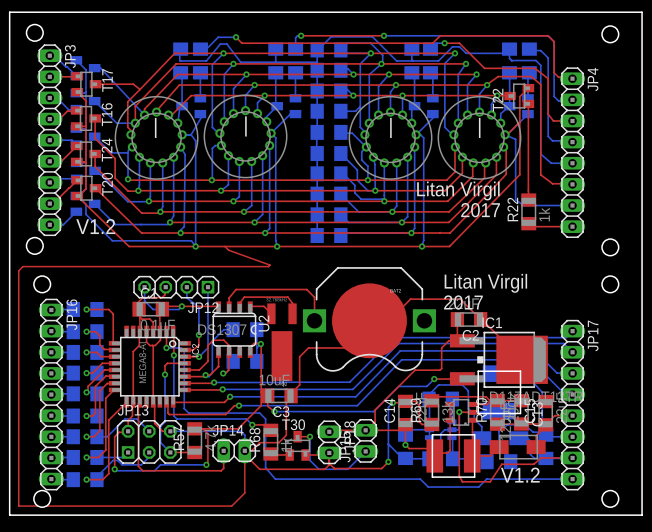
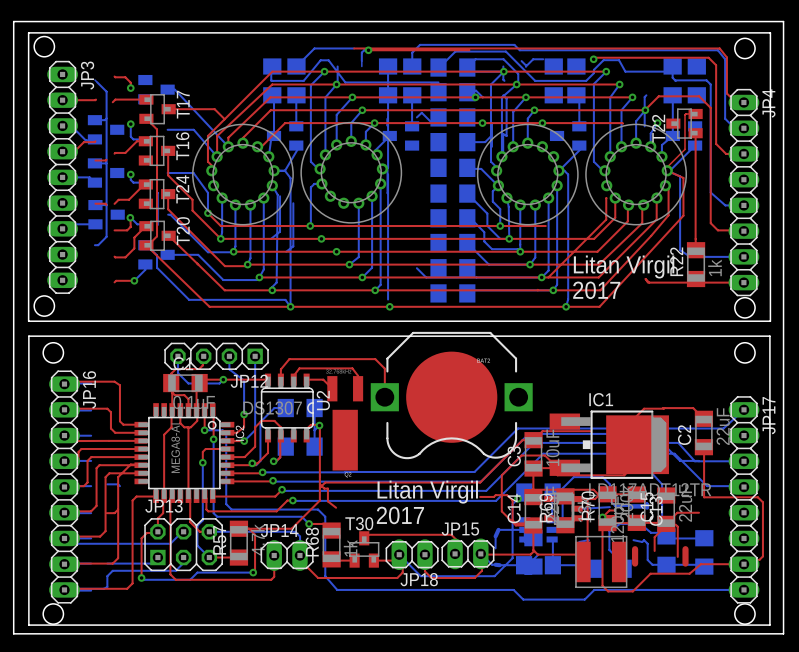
board edge: none -> (28, 32) (770, 32) (770, 321) (28, 321) (28, 32)
top track: none -> (354, 48) (719, 48) (726, 57) (726, 93) (734, 100) (745, 100) (743, 102)
bottom track: none -> (354, 48) (314, 48) (296, 66)
bottom track: (383, 35) (425, 35) -> (412, 66) (412, 52) (420, 44) (514, 44) (519, 50)
via: (383, 35) -> none
bottom track: (548, 35) (554, 41) (554, 96) (558, 100) (572, 99) -> (669, 50) (717, 50) (725, 59) (725, 118) (734, 128) (743, 128)
top track: (236, 37) (241, 43) (432, 43) (440, 35) (548, 35) (554, 41) (554, 72) (558, 77) (572, 78) -> none
bottom track: (236, 37) (218, 37) (206, 49) (200, 49) -> none
via: (236, 37) -> none
top track: (445, 41) (444, 43) (459, 43) (484, 68) (534, 68) (548, 78) (548, 114) (553, 120) (572, 120) -> none
via: (444, 43) -> none
top track: none -> (593, 59) (595, 57) (708, 57) (716, 65) (716, 143) (726, 153) (743, 153)
via: none -> (593, 59)
bottom track: (180, 49) (181, 60) (206, 60) (220, 44) (226, 44) (240, 62) (282, 62) -> (272, 66) (271, 80) (303, 80) (320, 60) (328, 60) (345, 82)
part: (329, 49) -> none
bottom track: (340, 49) (347, 43) (370, 43) (382, 55) (382, 62) (369, 74) (369, 123) -> (467, 67) (475, 59) (503, 59) (518, 73) (518, 82) (501, 97) (501, 156)
part: none -> (452, 67)
bottom track: (529, 49) (540, 50) (548, 57) (548, 136) (552, 140) (572, 142) -> none
bottom track: (317, 50) (331, 36) (372, 36) (396, 60) (438, 60) -> (438, 68) (455, 51) (505, 51) (535, 80)
top track: (222, 53) (174, 53) (140, 89) -> (272, 71) (207, 135) (207, 161) (215, 169) (211, 170)
bottom track: (223, 53) (212, 64) (212, 127) (219, 133) -> (324, 71) (310, 85) (310, 161) (320, 168)
via: (223, 53) -> none
via: none -> (324, 71)
bottom track: (343, 53) (370, 53) (360, 63) (360, 127) (366, 133) (364, 134) -> (470, 71) (503, 71) (490, 84) (490, 161) (498, 169) (496, 170)
via: (370, 53) -> none
via: none -> (503, 71)
bottom track: (454, 53) (444, 63) (444, 127) (453, 134) -> (606, 71) (593, 83) (593, 161) (604, 170)
via: (454, 53) -> none
top track: none -> (556, 71) (606, 71)
via: none -> (606, 71)
bottom track: (49, 55) (54, 55) (76, 76) -> none
top track: none -> (114, 76) (125, 77) (130, 82) (130, 88)
part: (180, 60) -> none
part: (200, 60) -> none
part: none -> (272, 80)
part: none -> (296, 80)
part: (275, 60) -> none
part: (295, 60) -> none
part: none -> (388, 80)
part: none -> (412, 80)
part: (411, 60) -> none
part: (430, 60) -> none
bottom track: (438, 60) (452, 46) (459, 46) (466, 53) (508, 53) (509, 49) (509, 58) (512, 60) -> (535, 80) (586, 80) (603, 60) (619, 60) (625, 71) (671, 71) (672, 66) (672, 77) (675, 80)
part: none -> (553, 80)
part: none -> (576, 80)
part: (509, 60) -> none
bottom track: (511, 60) (535, 60) (540, 65) (540, 154) (551, 163) (572, 163) -> none
part: (529, 60) -> none
part: none -> (672, 80)
bottom track: none -> (675, 80) (706, 80) (710, 84) (710, 192) (725, 205) (743, 205)
part: none -> (696, 80)
bottom track: none -> (388, 82) (438, 82)
top track: (222, 63) (176, 63) (135, 106) (135, 123) -> (272, 84) (217, 136) (217, 156)
bottom track: (233, 63) (224, 74) (224, 121) -> (336, 84) (325, 97) (325, 154)
via: (233, 63) -> none
via: none -> (336, 84)
via: (381, 63) -> none
via: none -> (516, 84)
top track: none -> (569, 84) (619, 84)
bottom track: (465, 63) (458, 74) (458, 123) -> (619, 84) (610, 97) (610, 156)
via: (465, 63) -> none
via: none -> (619, 84)
via: none -> (130, 88)
part: (85, 68) -> none
bottom track: (94, 68) (100, 68) (144, 115) -> (167, 89) (174, 89) (228, 146)
part: none -> (156, 89)
part: (329, 70) -> none
bottom track: (340, 70) (348, 68) (353, 74) -> (467, 92) (476, 90) (482, 97)
part: none -> (452, 92)
bottom track: (180, 72) (180, 107) -> (272, 95) (274, 97) (274, 135) (272, 137)
bottom track: (200, 72) (200, 98) -> (296, 95) (296, 126)
bottom track: (275, 72) (276, 106) -> none
bottom track: (295, 72) (295, 98) -> (412, 95) (412, 126)
bottom track: (430, 72) (432, 75) (432, 98) -> (576, 95) (579, 98) (579, 126)
bottom track: (509, 72) (509, 106) (500, 113) (500, 123) -> (672, 95) (672, 135) (661, 145) (661, 156)
top track: (220, 74) (177, 74) (144, 109) (144, 115) -> (270, 97) (228, 137) (228, 146)
bottom track: (246, 74) (233, 88) (233, 113) -> (352, 97) (336, 114) (336, 144)
via: (246, 74) -> none
via: none -> (352, 97)
via: (353, 74) -> none
bottom track: (389, 74) (378, 86) (378, 115) -> (525, 97) (513, 111) (513, 146)
via: none -> (525, 97)
top track: none -> (582, 97) (632, 97)
bottom track: (476, 74) (467, 84) (467, 115) -> (632, 97) (621, 110) (621, 146)
via: (476, 74) -> none
via: none -> (632, 97)
top track: none -> (146, 99) (115, 99) (112, 102)
T17 position: (86, 84) -> (157, 109)
top track: (95, 84) (133, 84) (140, 89) -> none
top track: none -> (168, 109) (214, 109) (224, 119)
top track: (220, 85) (179, 85) (156, 112) -> (270, 110) (243, 137) (242, 143)
bottom track: (254, 85) (245, 95) (245, 110) -> (362, 110) (351, 123) (351, 141)
via: (254, 85) -> none
via: none -> (362, 110)
bottom track: (395, 85) (390, 91) (390, 112) -> (534, 110) (527, 118) (527, 143)
via: (395, 85) -> none
via: none -> (534, 110)
top track: (487, 85) (498, 76) (531, 76) (540, 84) (540, 174) (552, 183) (580, 183) -> (594, 110) (645, 110) (658, 96) (699, 96) (710, 107) (710, 223) (717, 230) (743, 231)
bottom track: (487, 85) (479, 94) (479, 112) -> (645, 110) (636, 121) (636, 143)
via: (487, 85) -> none
via: none -> (645, 110)
top track: (528, 88) (519, 96) (519, 174) (449, 246) -> (695, 113) (684, 114) (684, 149) (665, 169) (683, 177) (683, 215) (599, 306) (549, 306)
top track: (140, 89) (127, 101) (127, 127) (133, 133) (130, 134) -> none
part: (329, 90) -> none
part: none -> (452, 117)
top track: (77, 92) (85, 100) (85, 188) (77, 196) (129, 246) (170, 246) -> (146, 118) (157, 129) (157, 236) (146, 245) (209, 306)
top track: (232, 95) (191, 95) (171, 115) (168, 115) -> (285, 123) (261, 146) (257, 146)
bottom track: (264, 95) (257, 102) (257, 113) -> (374, 123) (365, 131) (365, 144)
via: (264, 95) -> none
via: none -> (374, 123)
via: (353, 95) -> none
via: none -> (482, 123)
via: (402, 95) -> none
via: none -> (542, 123)
bottom track: (497, 95) (491, 104) (491, 115) -> (657, 123) (650, 133) (650, 146)
via: (497, 95) -> none
via: none -> (657, 123)
bottom track: none -> (130, 124) (130, 136) (133, 139) (145, 139)
via: none -> (130, 124)
T22 position: (519, 96) -> (684, 123)
bottom track: (94, 101) (116, 123) (135, 123) -> none
bottom track: none -> (167, 129) (193, 129) (217, 156)
part footprint: [310, 103, 348, 119] -> [382, 121, 420, 151]
top track: (528, 103) (528, 200) -> (695, 133) (696, 250)
part: (191, 106) -> none
part: none -> (285, 135)
bottom track: (277, 106) (265, 118) (266, 121) -> (389, 135) (375, 150) (377, 154)
part: (286, 106) -> none
bottom track: (360, 106) (355, 111) (340, 111) -> (490, 136) (485, 142) (467, 142)
part: (423, 106) -> none
part: none -> (568, 135)
part: (518, 106) -> none
part: none -> (683, 135)
bottom track: (180, 107) (177, 123) -> (272, 137) (268, 156)
top track: none -> (145, 141) (137, 141) (125, 152) (114, 153)
part: none -> (452, 142)
bottom track: (200, 114) (201, 116) (191, 134) (182, 134) (191, 134) (195, 140) (195, 246) (191, 240) -> (298, 148) (284, 170) (274, 170) (284, 170) (290, 178) (290, 306) (285, 299) (234, 299)
bottom track: (295, 114) (290, 114) (271, 133) (275, 137) (277, 246) -> none
bottom track: (432, 114) (434, 116) (416, 134) (420, 134) (423, 137) (423, 240) (422, 246) -> (579, 145) (581, 148) (558, 170) (564, 170) (568, 174) (568, 299) (566, 306)
bottom track: (527, 114) (505, 134) (515, 139) (515, 200) (524, 205) (565, 205) -> (695, 145) (669, 170) (667, 170) (680, 176) (680, 250) (690, 256)
T16 position: (85, 118) -> (157, 150)
top track: (95, 118) (95, 138) (115, 158) (115, 178) (128, 191) (139, 190) -> none
top track: (519, 121) (505, 134) -> none
text: | (245, 126) -> none
text: | (155, 127) -> none
text: | (390, 127) -> none
text: | (479, 127) -> none
part: (329, 132) -> none
bottom track: (340, 132) (352, 133) (366, 147) (361, 151) (361, 160) (367, 166) (367, 180) -> (467, 167) (481, 168) (498, 185) (492, 191) (492, 201) (500, 209) (500, 226)
part: none -> (452, 167)
bottom track: (94, 136) (110, 152) (127, 152) (129, 147) (132, 147) -> none
bottom track: none -> (167, 173) (193, 173) (207, 192) (207, 213)
part: (245, 136) -> none
part: none -> (351, 172)
bottom track: none -> (130, 174) (130, 179) (133, 182) (145, 182)
via: none -> (130, 174)
part: (156, 137) -> none
part: none -> (242, 174)
part: (390, 137) -> none
part: none -> (527, 174)
part: (479, 137) -> none
part: none -> (636, 174)
bottom track: (221, 145) (215, 145) (212, 148) (211, 180) -> (321, 183) (314, 183) (310, 187) (310, 226)
bottom track: (269, 145) (269, 228) (265, 232) -> (380, 183) (380, 284) (375, 290)
top track: (76, 146) (61, 161) (49, 161) -> none
top track: none -> (145, 184) (128, 199) (118, 199) (114, 203)
bottom track: (180, 147) (185, 154) (184, 226) (180, 232) -> (272, 185) (277, 194) (276, 282) (272, 286) (272, 290)
bottom track: (414, 147) (414, 228) (411, 232) -> (557, 185) (557, 284) (553, 290) (502, 290)
top track: (455, 147) (454, 171) (446, 180) -> none
top track: (503, 147) (506, 149) (506, 174) (450, 232) -> (665, 185) (668, 188) (668, 215) (600, 290) (549, 290)
JP4 position: (572, 152) -> (743, 192)
T24 position: (85, 153) -> (157, 194)
top track: (95, 153) (95, 166) (141, 213) (200, 211) -> (168, 194) (168, 209) (224, 266) (246, 264)
part: (329, 153) -> none
bottom track: (340, 153) (357, 170) (357, 180) (367, 190) (375, 190) (373, 157) -> (467, 193) (487, 213) (487, 226) (500, 238) (509, 238) (506, 198)
part: none -> (452, 193)
bottom track: (262, 155) (262, 214) (254, 222) -> (372, 196) (372, 267) (362, 277)
bottom track: (139, 157) (138, 190) -> (222, 198) (220, 238)
bottom track: (173, 157) (173, 215) (167, 224) (115, 224) (94, 203) -> none
bottom track: none -> (263, 198) (263, 269) (256, 280) (223, 280) (198, 254) (167, 254)
bottom track: (407, 157) (407, 216) (401, 222) -> (548, 198) (548, 270) (541, 277) (491, 277)
top track: (462, 157) (462, 173) (445, 190) -> (615, 198) (615, 217) (594, 238) (543, 238)
top track: none -> (656, 198) (656, 219) (598, 277) (548, 277)
bottom track: (251, 161) (251, 205) (244, 211) -> (358, 203) (358, 257) (349, 264)
bottom track: (150, 162) (150, 196) (148, 201) (127, 201) (95, 170) -> (235, 205) (235, 246) (233, 252) (207, 252) (170, 214) (168, 214)
bottom track: (162, 162) (162, 206) (160, 211) -> (250, 205) (250, 258) (247, 264)
bottom track: (384, 162) (384, 201) (382, 199) (361, 199) (354, 192) (354, 185) (343, 173) (340, 173) -> (520, 205) (520, 251) (517, 249) (492, 249) (484, 241) (484, 232) (470, 218) (467, 218)
bottom track: (396, 162) (396, 206) (392, 211) (358, 211) (340, 194) -> (535, 205) (535, 257) (530, 264) (488, 264) (467, 242)
top track: (473, 162) (472, 176) (447, 201) -> (628, 205) (627, 221) (597, 251) (547, 251)
top track: (485, 162) (484, 177) (449, 211) -> (643, 205) (642, 223) (599, 264) (548, 264)
via: none -> (207, 213)
top track: none -> (130, 217) (130, 226) (127, 230) (114, 230)
bottom track: none -> (130, 217) (137, 224) (145, 224)
via: none -> (130, 217)
part: (329, 173) -> none
part: none -> (452, 218)
top track: (128, 179) (179, 180) -> (207, 213) (220, 226)
via: (128, 179) -> none
top track: (77, 180) (53, 203) (49, 203) -> none
top track: none -> (145, 226) (134, 237) (134, 248) (125, 257) (114, 256)
via: (211, 180) -> none
via: none -> (310, 226)
via: (367, 180) -> none
via: none -> (500, 226)
T20 position: (86, 188) -> (157, 235)
top track: (95, 188) (141, 232) (183, 232) -> (168, 235) (224, 290)
top track: (138, 190) (179, 190) -> (168, 150) (168, 175) (192, 199) (192, 210) (220, 238)
via: (138, 190) -> none
via: none -> (220, 238)
via: (221, 190) -> none
via: none -> (321, 238)
via: (375, 190) -> none
via: none -> (509, 238)
text position: Litan Virgil (458, 190) -> Litan Virgil (624, 266)
part: (329, 194) -> none
part: none -> (452, 242)
bottom track: (77, 195) (85, 204) (85, 214) (112, 240) (153, 240) -> (146, 245) (157, 255) (157, 267) (189, 299)
top track: (148, 201) (190, 201) -> none
via: (148, 201) -> none
via: none -> (233, 251)
via: (233, 201) -> none
via: none -> (336, 251)
via: (384, 201) -> none
via: none -> (520, 251)
part position: (85, 203) -> (156, 254)
bottom track: none -> (698, 256) (743, 256)
text position: 2017 (480, 210) -> 2017 (596, 290)
bottom track: (76, 211) (63, 224) (49, 224) -> none
bottom track: none -> (145, 264) (145, 269) (134, 280)
via: (160, 211) -> none
via: none -> (247, 264)
via: (244, 211) -> none
via: none -> (349, 264)
via: (392, 211) -> none
via: none -> (530, 264)
R22 position: (528, 211) -> (696, 264)
part: (329, 214) -> none
part: none -> (452, 268)
top track: (170, 222) (211, 222) -> none
via: (170, 222) -> none
via: none -> (259, 277)
via: (254, 222) -> none
via: none -> (362, 277)
via: (401, 222) -> none
via: none -> (541, 277)
top track: none -> (134, 280) (114, 282)
via: none -> (134, 280)
text: V1.2 (95, 226) -> none
top track: none -> (698, 282) (743, 282)
via: (180, 232) -> none
via: none -> (272, 290)
via: (265, 232) -> none
via: none -> (375, 290)
via: (411, 232) -> none
via: none -> (553, 290)
part: (329, 235) -> none
part: none -> (452, 293)
via: (195, 246) -> none
top track: (224, 246) (228, 250) (270, 265) (22, 266) (18, 270) (18, 506) (231, 506) (244, 493) (244, 450) (251, 450) (259, 442) (278, 442) (286, 435) (286, 402) (299, 384) (299, 356) (308, 347) (345, 347) (372, 320) -> none
via: none -> (290, 306)
via: (277, 246) -> none
via: none -> (389, 306)
via: (422, 246) -> none
via: none -> (566, 306)
board edge: none -> (28, 336) (769, 336) (769, 625) (28, 625) (28, 336)
text: Litan Virgil (485, 283) -> none
text: 2017 (463, 302) -> none
part: (85, 309) -> none
top track: (86, 309) (108, 309) (113, 313) (114, 343) -> (53, 384) (56, 381) (114, 381) (119, 385) (119, 421) (123, 424) (140, 424)
via: (86, 309) -> none
top track: (457, 319) (457, 335) (462, 340) (448, 340) (441, 347) (441, 368) (415, 370) (375, 410) (375, 421) (366, 430) -> none
C2 rotation: 0° (469, 319) -> 90° clockwise (703, 432)
C2 position: (469, 319) -> (703, 432)
top track: (388, 320) (410, 299) (460, 299) (522, 359) -> none
top track: none -> (662, 408) (693, 408) (703, 418)
top track: none -> (664, 408) (644, 408) (635, 417) (635, 464) (624, 475) (557, 475) (550, 468) (550, 460) (545, 455) (521, 455) (501, 475) (501, 511) (515, 525) (533, 525) (533, 550) (537, 554) (575, 554) (583, 561) (587, 557) (587, 500)
part: (85, 331) -> none
top track: (86, 331) (95, 331) (99, 336) (99, 345) (104, 349) (114, 350) -> (53, 409) (107, 408) (110, 412) (110, 428) (115, 432) (140, 432)
via: (86, 331) -> none
bottom track: (572, 331) (566, 337) (394, 337) (349, 382) -> (744, 409) (723, 428) (518, 428) (474, 471) (427, 471)
top track: none -> (590, 431) (542, 431) (533, 440) (522, 440) (480, 482) (325, 482) (319, 487)
bottom track: (432, 350) (400, 350) (355, 396) (230, 396) -> (528, 433) (481, 481) (273, 481)
part: (85, 352) -> none
top track: (86, 352) (96, 352) (101, 356) -> (53, 435) (58, 441) (125, 440)
via: (86, 352) -> none
bottom track: (572, 352) (563, 343) (398, 343) (352, 389) (222, 389) -> none
top track: none -> (704, 447) (704, 497) (757, 497) (762, 502) (762, 556) (759, 559) (746, 559) (744, 564) (700, 564) (689, 573) (650, 573) (632, 591) (608, 591) (602, 585) (602, 517) (609, 510) (614, 510)
top track: (102, 363) (92, 373) (86, 373) -> (126, 449) (81, 449) (78, 451) (76, 460) (53, 461)
top track: (104, 369) (88, 386) (86, 392) -> (129, 457) (91, 457) (87, 460) (87, 482) (83, 486) (53, 487)
part: (85, 373) -> none
via: (86, 373) -> none
bottom track: none -> (744, 461) (694, 461) (678, 442) (534, 442) (486, 490) (284, 490)
top track: none -> (140, 465) (99, 465) (96, 468) (96, 505) (91, 511) (53, 512)
bottom track: (434, 379) (426, 386) (398, 386) (373, 411) (274, 411) -> none
via: (434, 379) -> none
top track: none -> (533, 468) (533, 497)
top track: (114, 383) (107, 383) (99, 390) (99, 430) (93, 436) (86, 436) -> (140, 473) (109, 473) (105, 477) (105, 531) (100, 536) (59, 536) (53, 538)
top track: (114, 389) (105, 398) (105, 450) (98, 457) (91, 457) -> (118, 509) (118, 558) (112, 563)
via: (86, 392) -> none
part: (499, 392) -> none
part: (85, 393) -> none
bottom track: (572, 394) (565, 394) (530, 359) (401, 359) (357, 405) (238, 405) -> none
bottom track: none -> (744, 487) (707, 486) (674, 453) (543, 453) (496, 500) (295, 500)
C3 rotation: 0° (279, 395) -> 90° clockwise (533, 454)
C3 position: (279, 395) -> (533, 454)
text: none -> Litan Virgil (427, 492)
top track: (126, 402) (108, 420) (108, 473) (102, 479) (86, 479) -> (156, 496) (136, 496) (132, 500) (132, 583) (127, 588) (53, 589)
bottom track: (392, 402) (388, 407) (388, 461) -> none
via: (392, 402) -> none
bottom track: none -> (518, 498) (512, 504) (512, 558) (494, 576) (420, 576) (399, 554)
via: none -> (518, 498)
top track: (450, 404) (450, 450) (439, 455) (434, 455) -> none
JP17 position: (572, 405) -> (744, 499)
bottom track: none -> (646, 504) (645, 505) (615, 505) (609, 500) (609, 484) (602, 477) (573, 477) (562, 488) (562, 522)
bottom track: none -> (646, 504) (645, 506) (632, 506) (630, 508) (647, 507) (646, 504)
via: (274, 411) -> none
R69 position: (431, 412) -> (565, 510)
bottom track: (459, 412) (459, 428) (444, 429) (440, 433) (440, 450) -> none
via: (459, 412) -> none
top track: (472, 412) (459, 412) (459, 475) (462, 481) (490, 481) (501, 464) (533, 464) (541, 457) (572, 457) -> none
C14 position: (405, 413) -> (533, 511)
part: (85, 416) -> none
via: (86, 416) -> none
text: none -> 2017 (400, 515)
via: none -> (602, 517)
top track: (472, 420) (472, 453) -> none
bottom track: (429, 421) (429, 394) (438, 384) (462, 384) (468, 390) (468, 408) (474, 412) (474, 419) (481, 426) (481, 438) -> none
top track: (405, 424) (405, 444) (409, 448) (440, 448) (434, 455) -> none
top track: none -> (675, 524) (677, 526) (677, 556)
top track: (405, 427) (402, 430) (329, 431) -> none
bottom track: (149, 431) (136, 418) (125, 418) (107, 436) (86, 436) -> (183, 531) (170, 543) (58, 543) (53, 538)
part: (85, 436) -> none
via: (86, 436) -> none
top track: (298, 436) (309, 436) -> (364, 538) (368, 534) (451, 534) (456, 540) (455, 553)
bottom track: (309, 436) (309, 460) (318, 469) (347, 469) (365, 451) -> none
via: (309, 436) -> none
part: (500, 438) -> none
JP15 rotation: 0° (365, 440) -> 90° clockwise (467, 553)
JP18 rotation: 0° (329, 442) -> 90° clockwise (412, 554)
via: (405, 444) -> none
top track: none -> (635, 549) (635, 563)
top track: none -> (685, 549) (685, 563)
part position: (405, 446) -> (533, 552)
top track: none -> (534, 550) (530, 554) (481, 555)
top track: (499, 447) (490, 455) (472, 455) -> none
part: (517, 447) -> none
part: none -> (704, 552)
top track: none -> (424, 554) (424, 571) (431, 577) (474, 577) (481, 570) (481, 555)
top track: (329, 452) (329, 463) (335, 469) -> none
part: (453, 455) -> none
part: none -> (601, 561)
part: (85, 457) -> none
top track: none -> (107, 563) (53, 564)
via: (86, 457) -> none
top track: (388, 461) (381, 468) (334, 468) -> none
via: (388, 461) -> none
bottom track: (142, 463) (122, 464) (117, 460) (113, 460) (96, 476) (96, 479) (86, 479) -> (175, 570) (112, 570) (107, 576) (107, 587) (103, 588) (52, 588) (53, 589)
text: V1.2 (520, 475) -> none
part: (85, 479) -> none
via: (86, 479) -> none
bottom track: none -> (698, 589) (744, 589)

